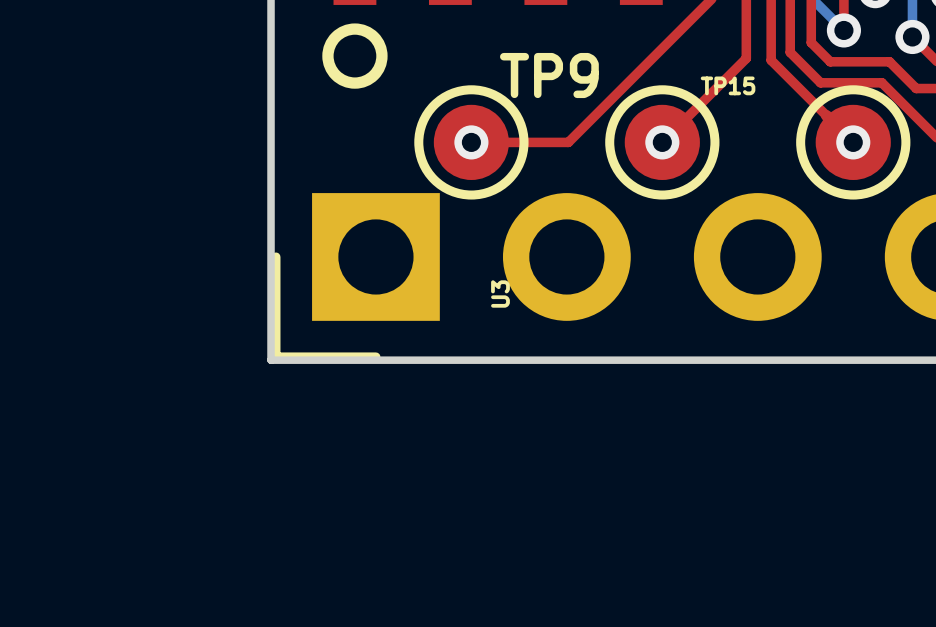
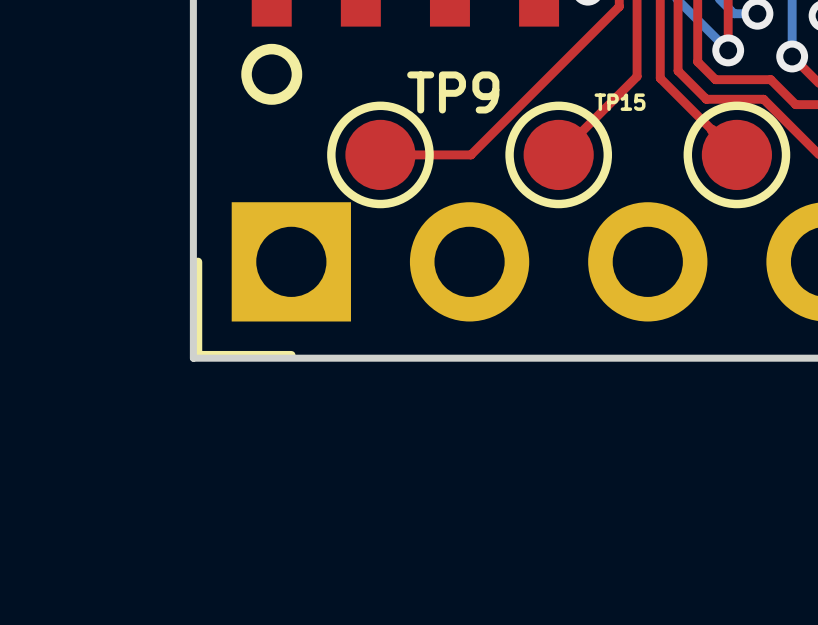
via: (471, 142) -> none
via: (662, 142) -> none
via: (853, 142) -> none
U3 name: U3 (500, 294) -> none

